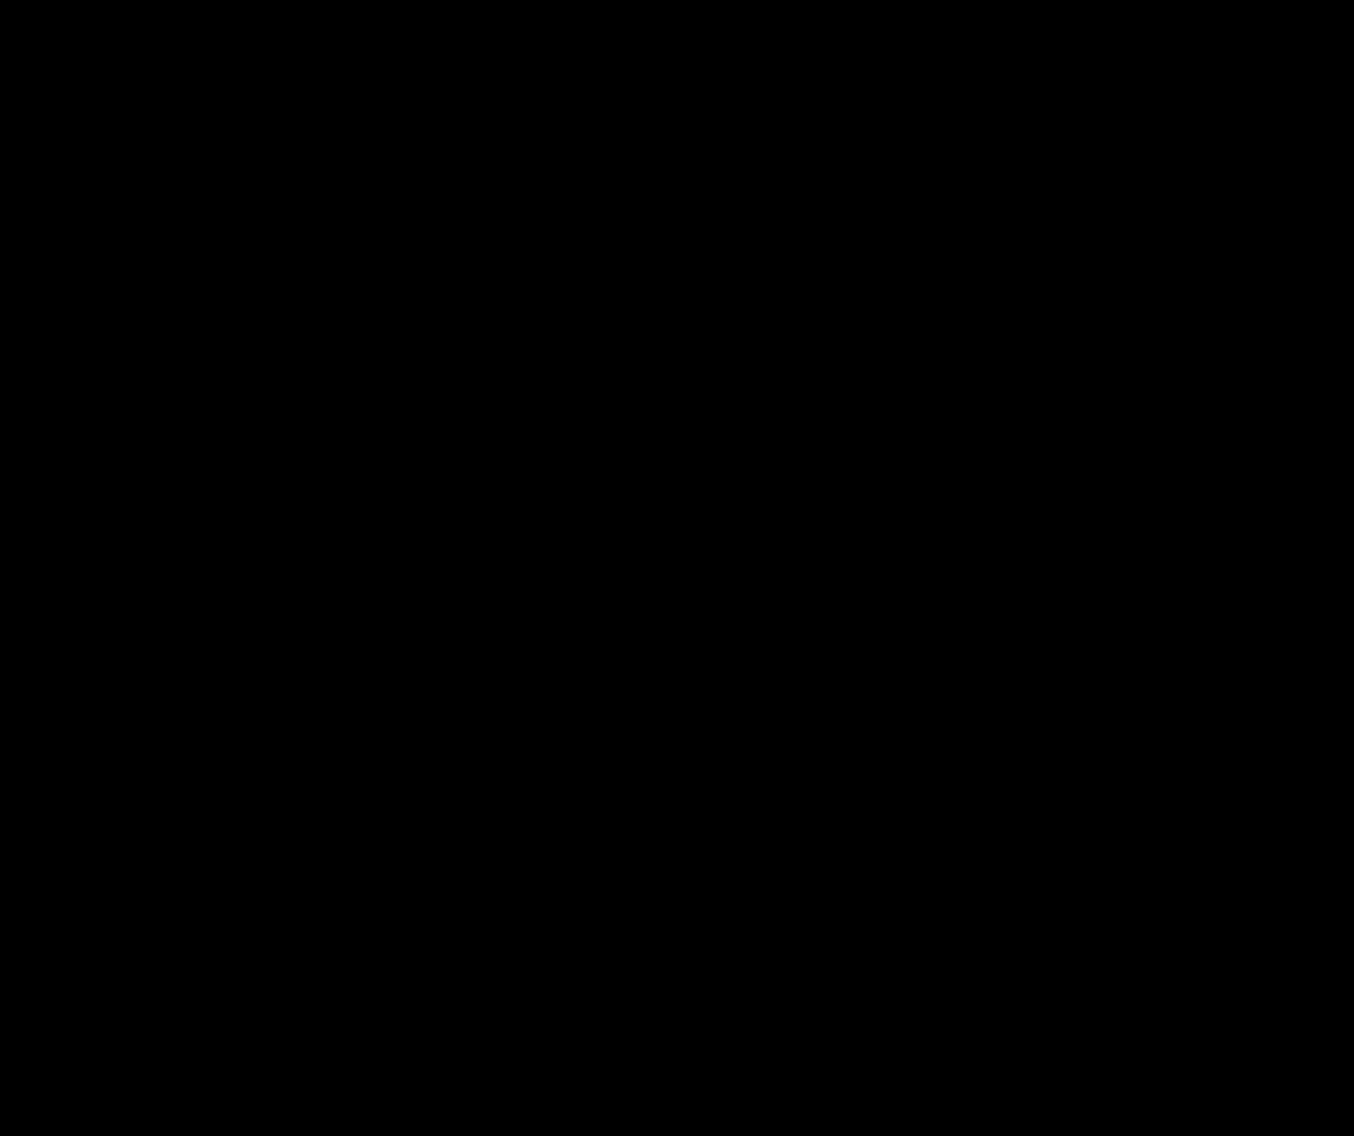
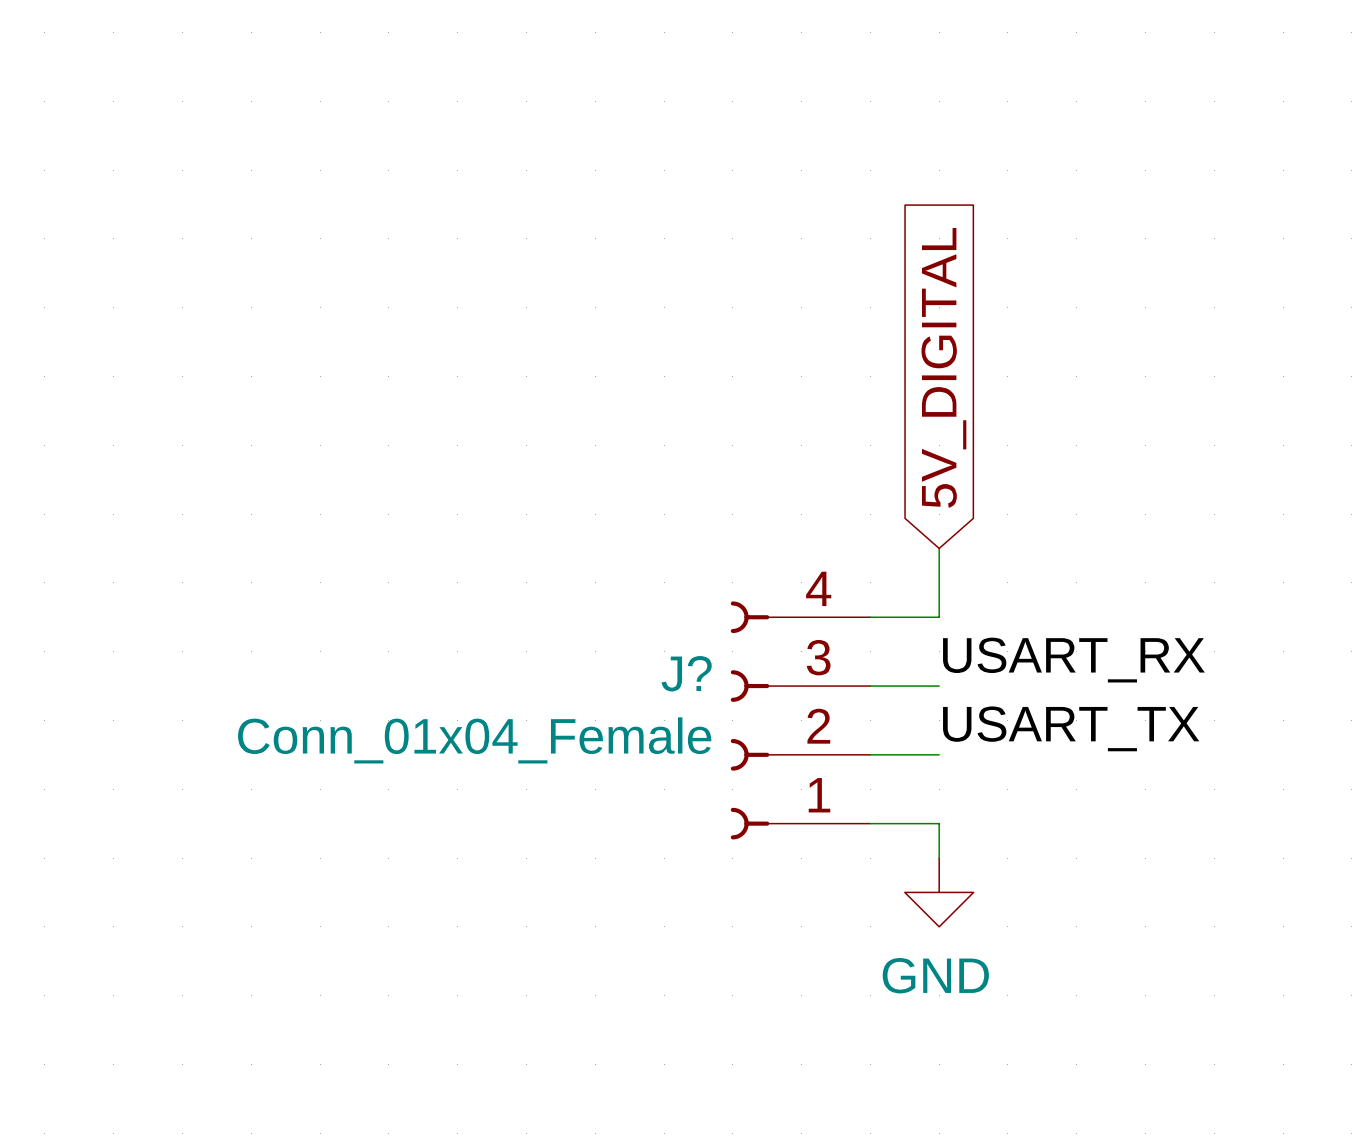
global label: none -> 5V_DIGITAL (943, 367)
wire: none -> (939, 548) (939, 617) (870, 617)
label: none -> USART_RX (1073, 660)
wire: none -> (870, 686) (939, 686)
J?: none -> Conn_01x04_Female (800, 720)
label: none -> USART_TX (1071, 728)
wire: none -> (870, 754) (939, 754)
wire: none -> (870, 823) (939, 823) (939, 858)
power symbol: none -> GND (939, 892)

